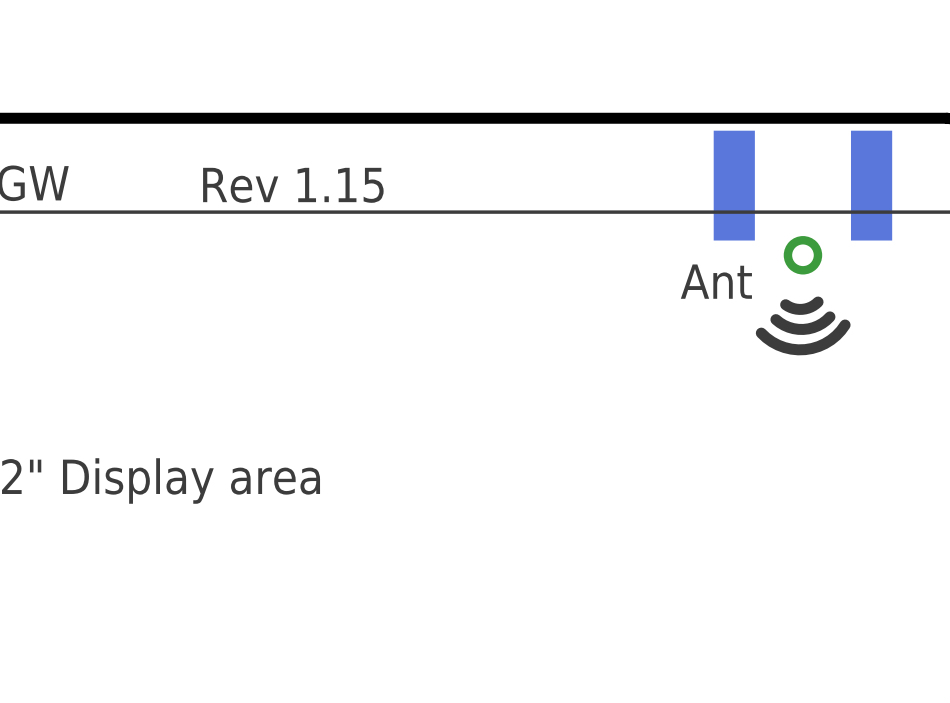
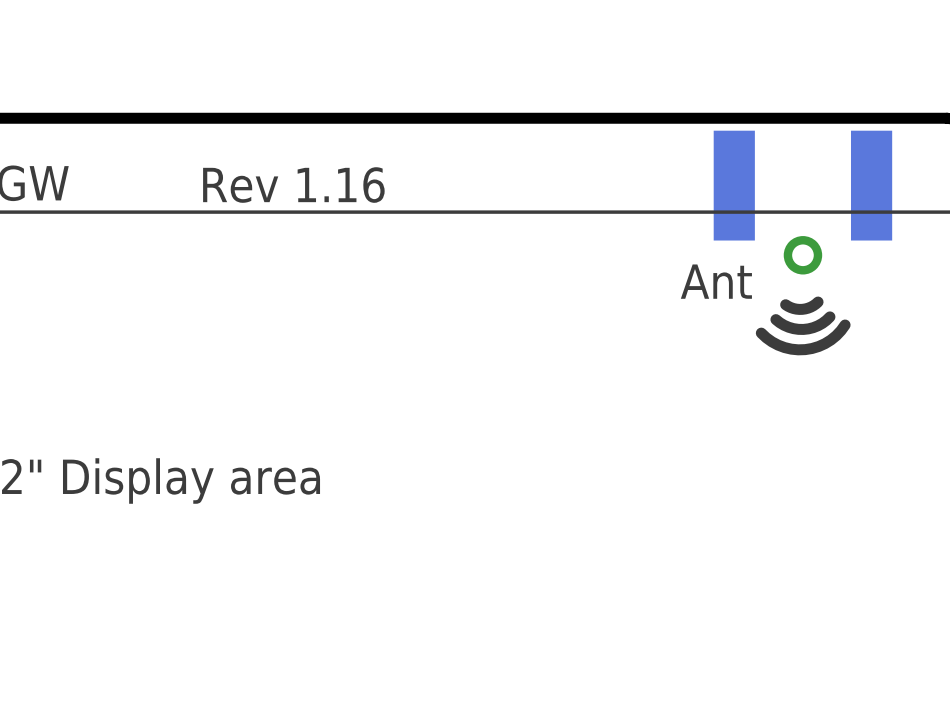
text: Rev 1.15 (293, 185) -> Rev 1.16 (293, 185)

